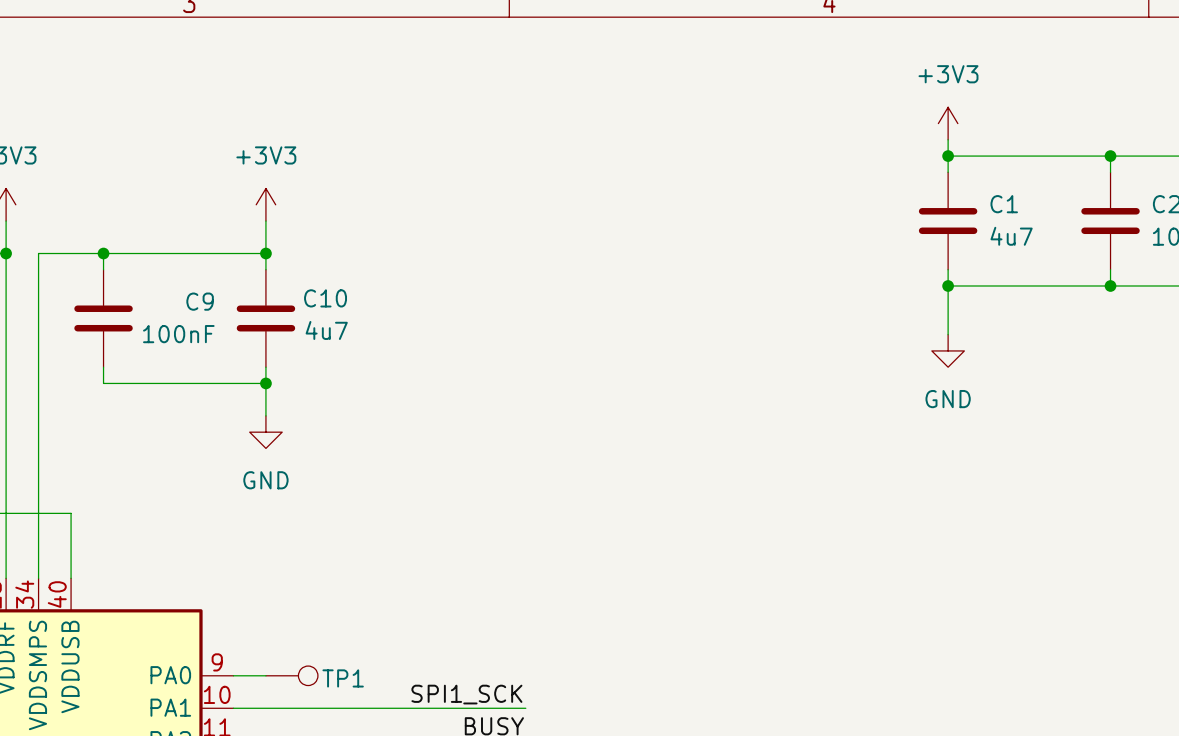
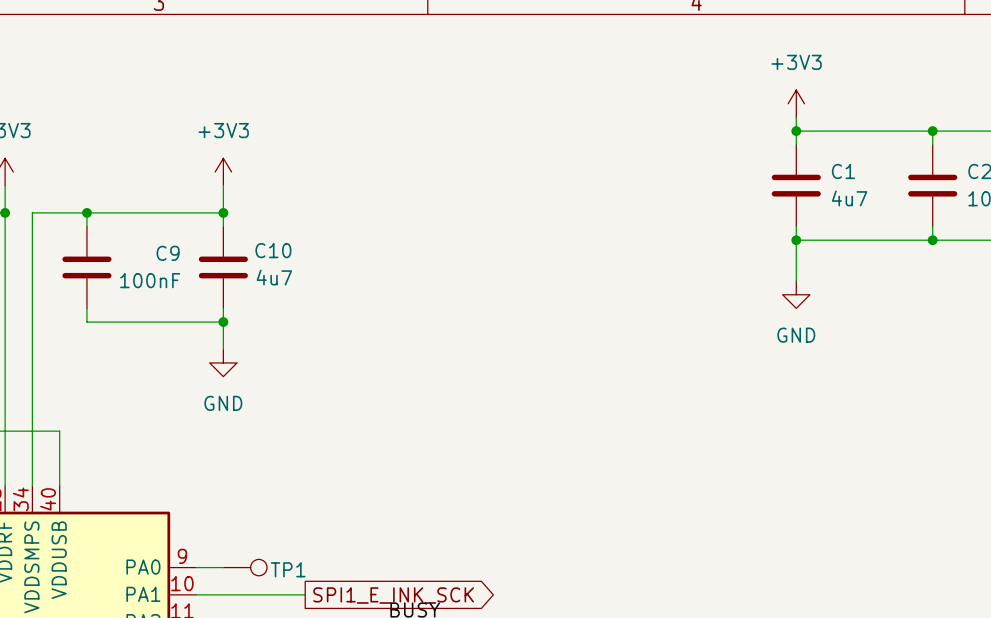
label: SPI1_SCK (466, 694) -> none
wire: (363, 708) (525, 708) -> none
global label: none -> SPI1_E_INK_SCK (393, 595)

